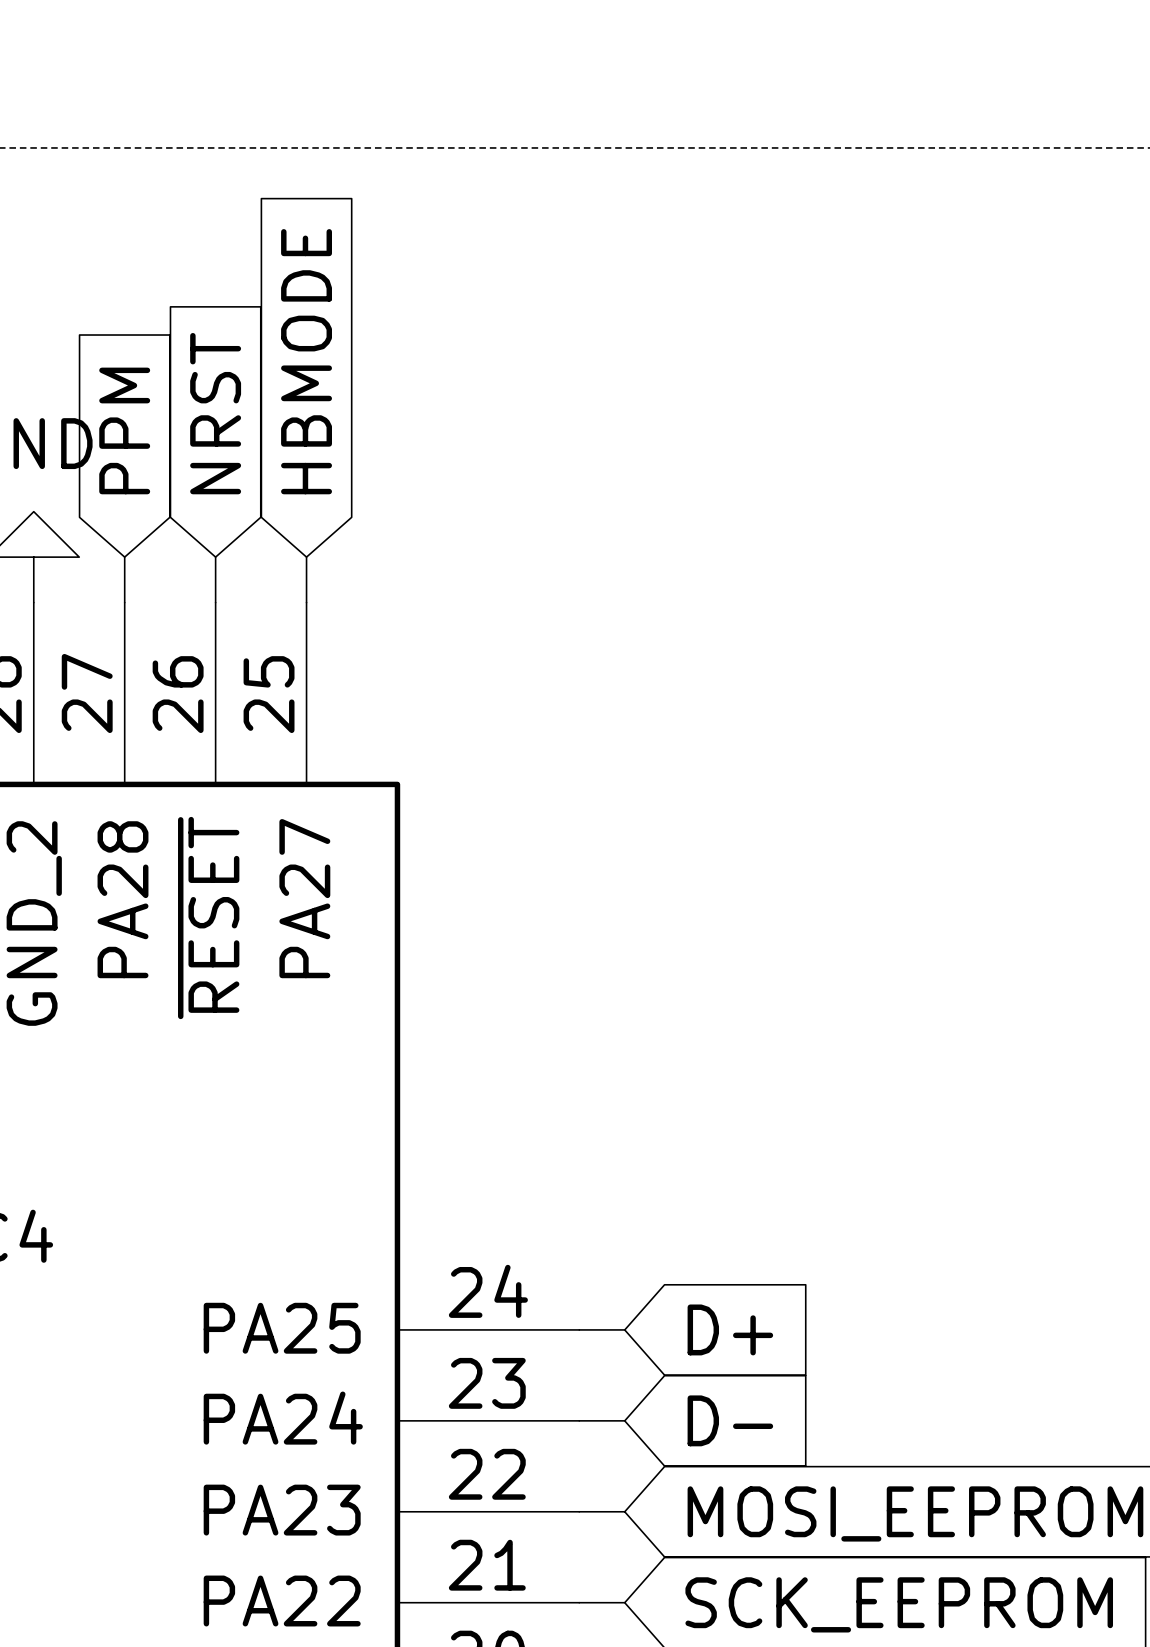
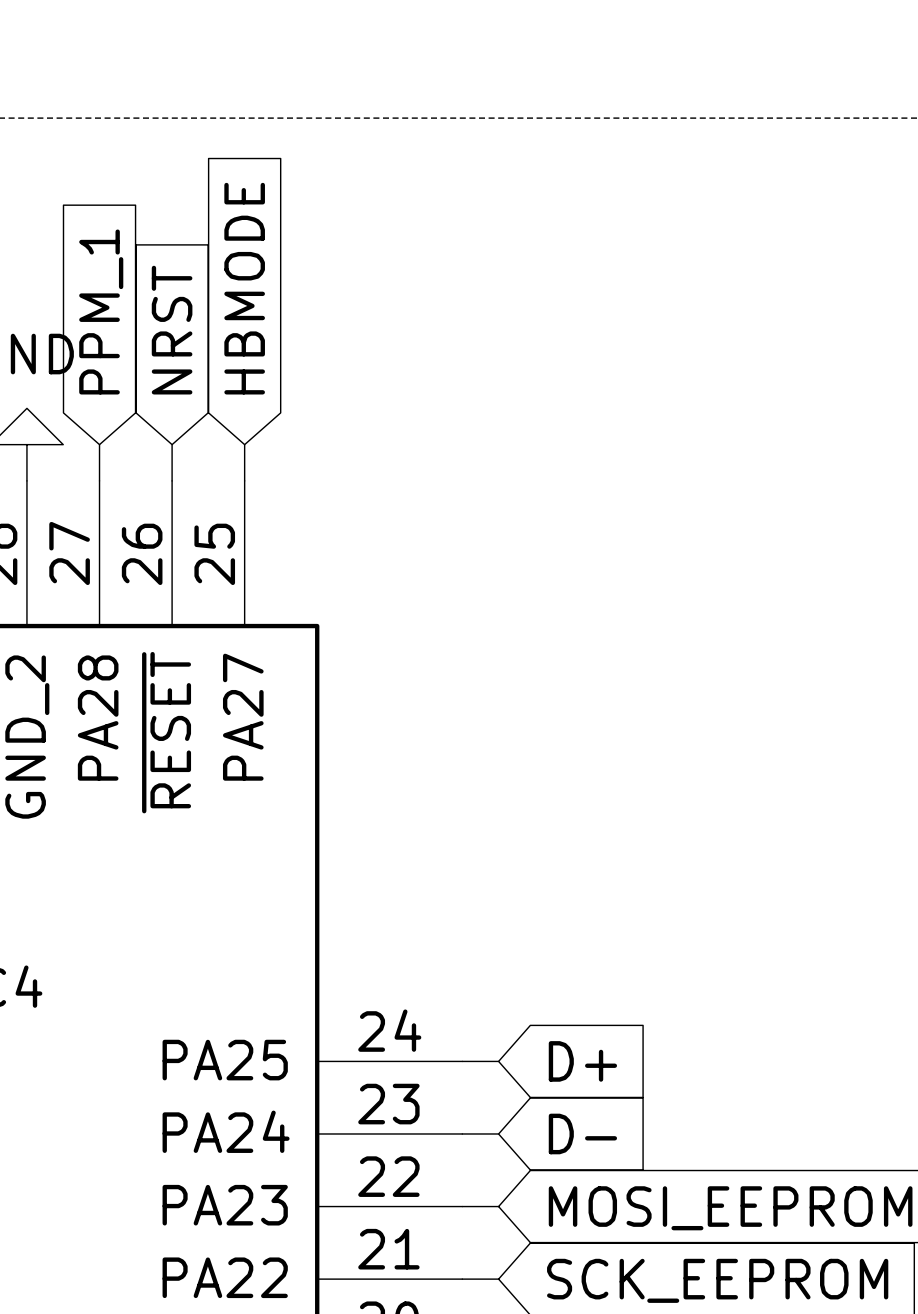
global label: PPM (124, 430) -> PPM_1 (101, 311)

